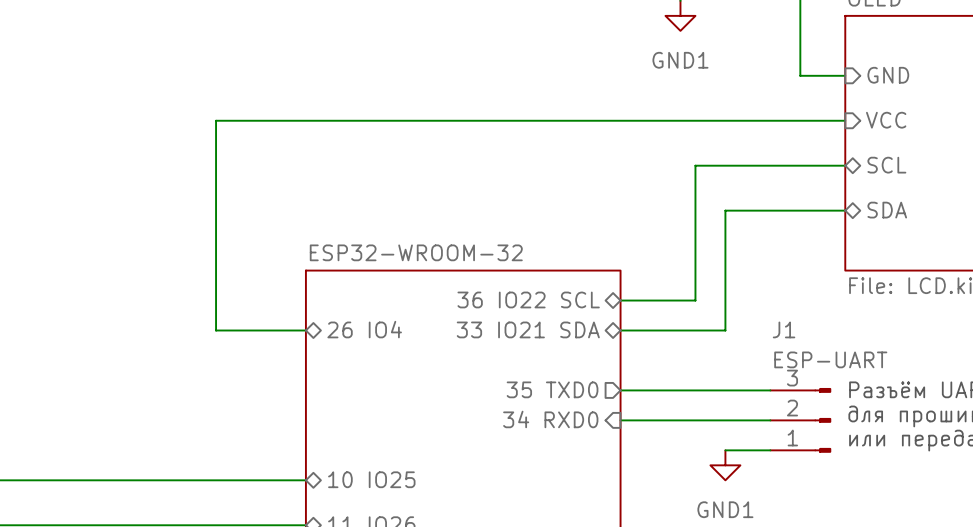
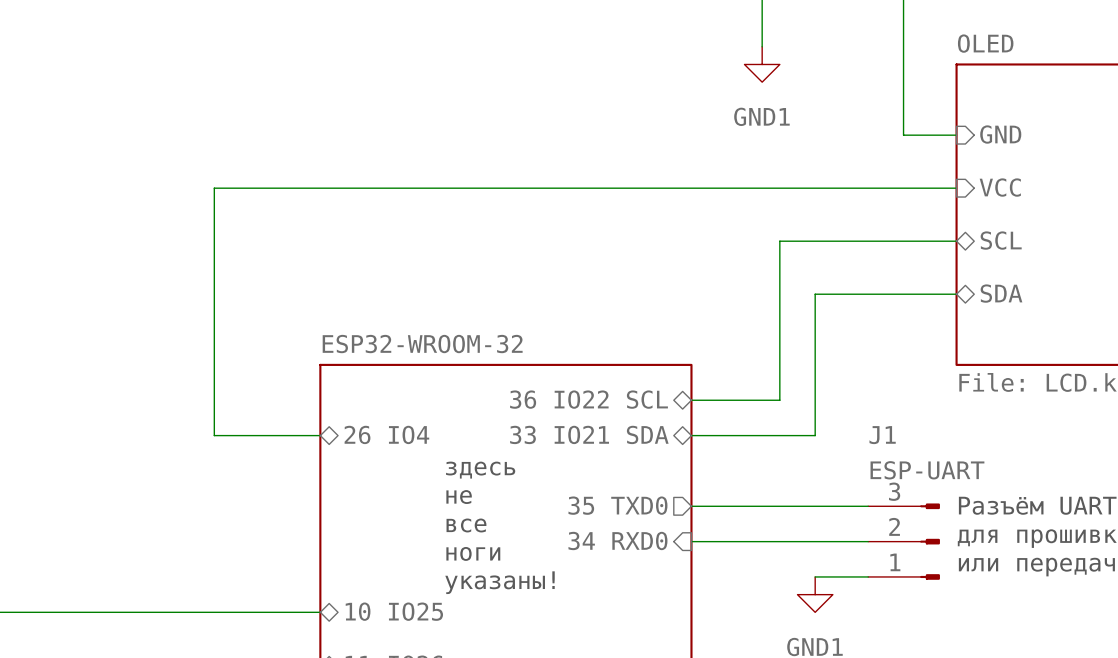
text: none -> здесь (480, 470)
text: none -> не (459, 497)
text: none -> все (466, 525)
text: none -> ноги (473, 553)
text: none -> указаны! (500, 582)

